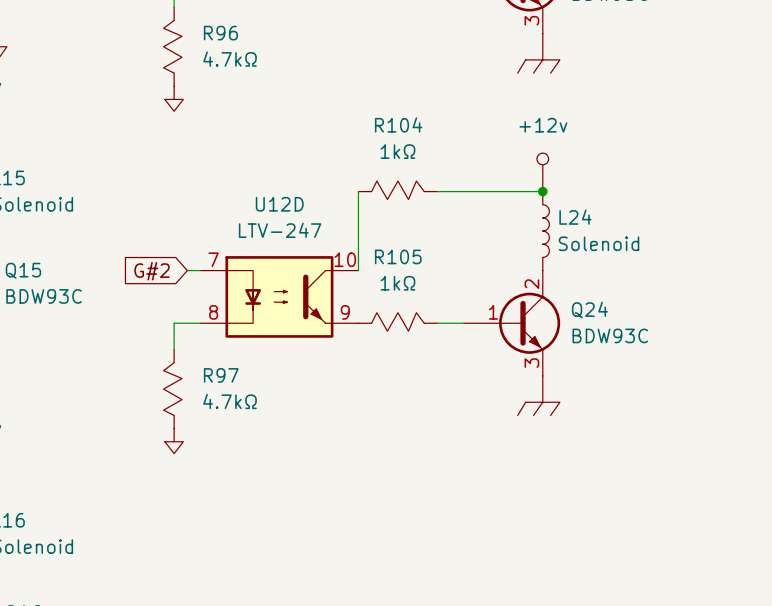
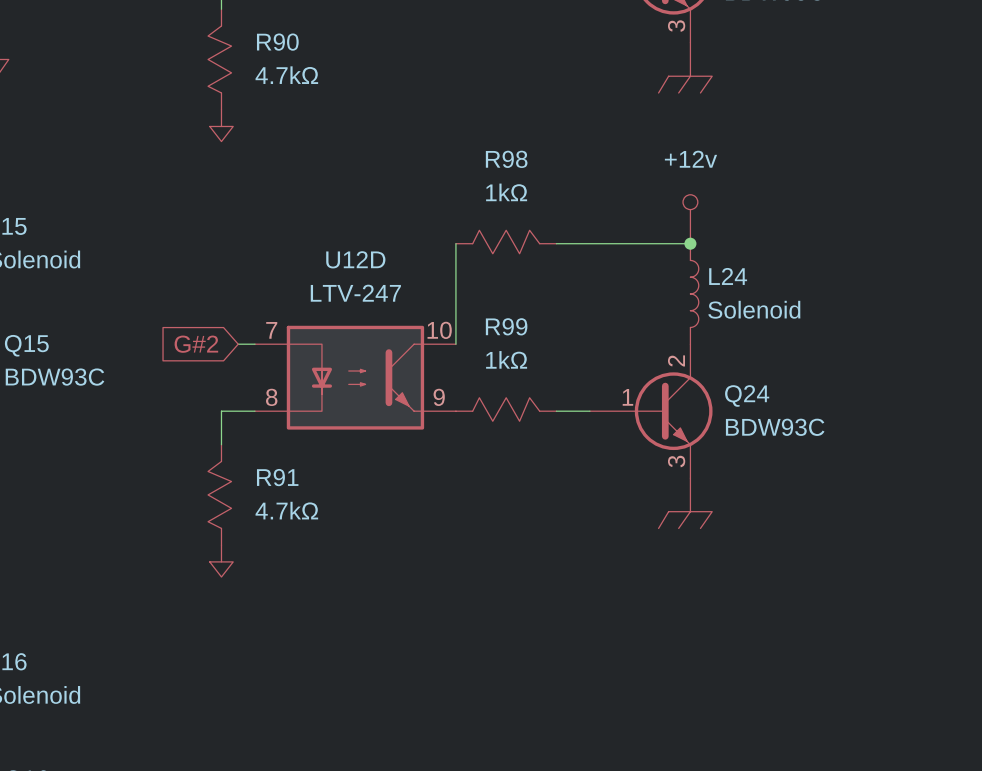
R96 name: R96 (220, 33) -> R90 (277, 42)
R104 name: R104 (398, 124) -> R98 (506, 159)
R105 name: R105 (398, 256) -> R99 (506, 326)
R97 name: R97 (221, 375) -> R91 (277, 477)

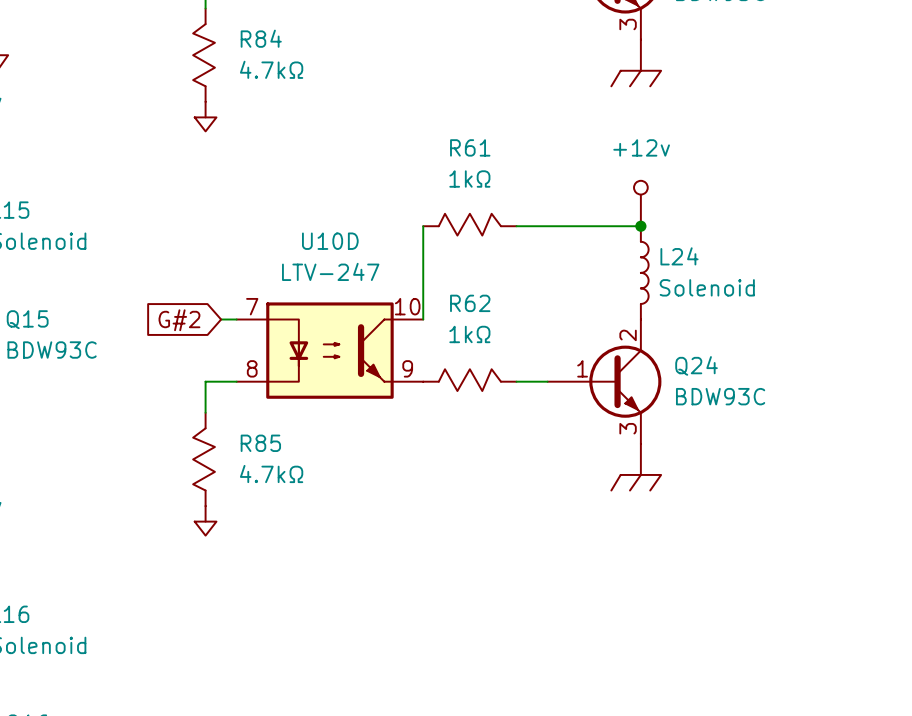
R90 name: R90 (277, 42) -> R84 (261, 38)
R98 name: R98 (506, 159) -> R61 (470, 147)
U12D name: U12D (355, 259) -> U10D (330, 241)
R99 name: R99 (506, 326) -> R62 (470, 303)
R91 name: R91 (277, 477) -> R85 (260, 443)

